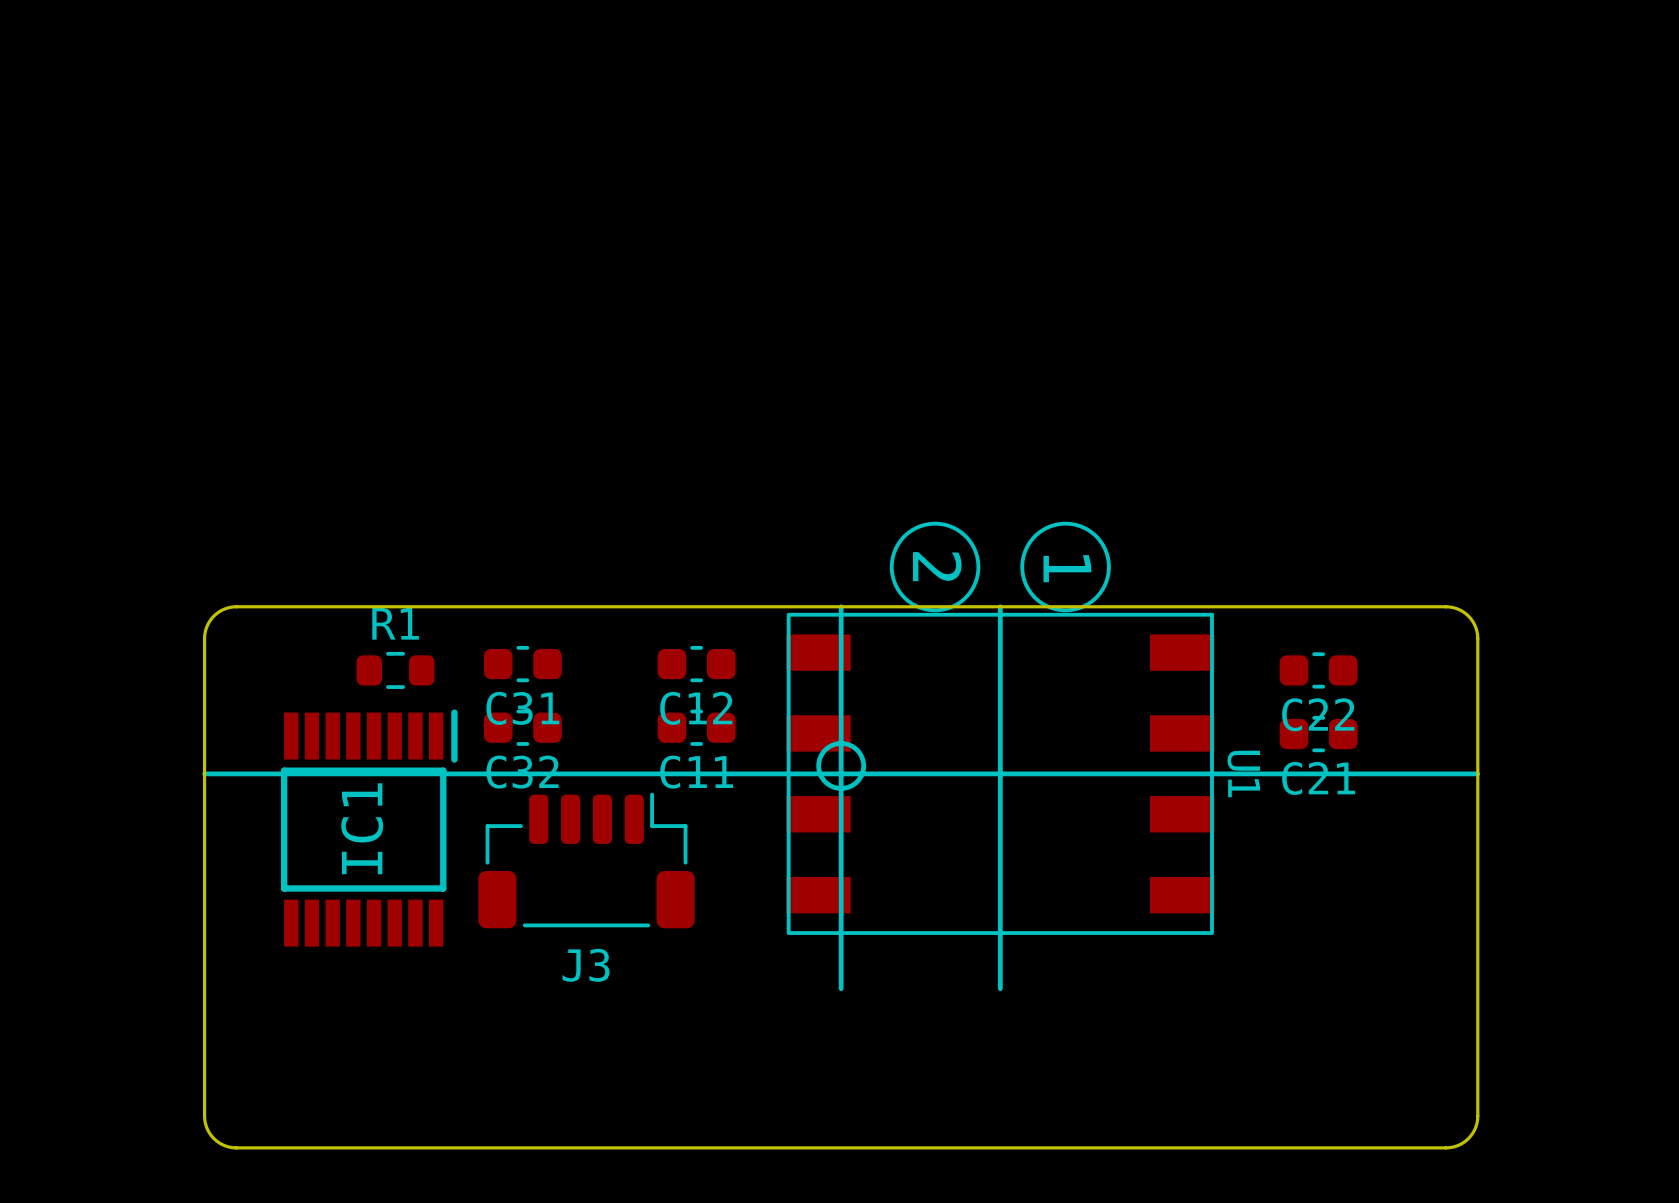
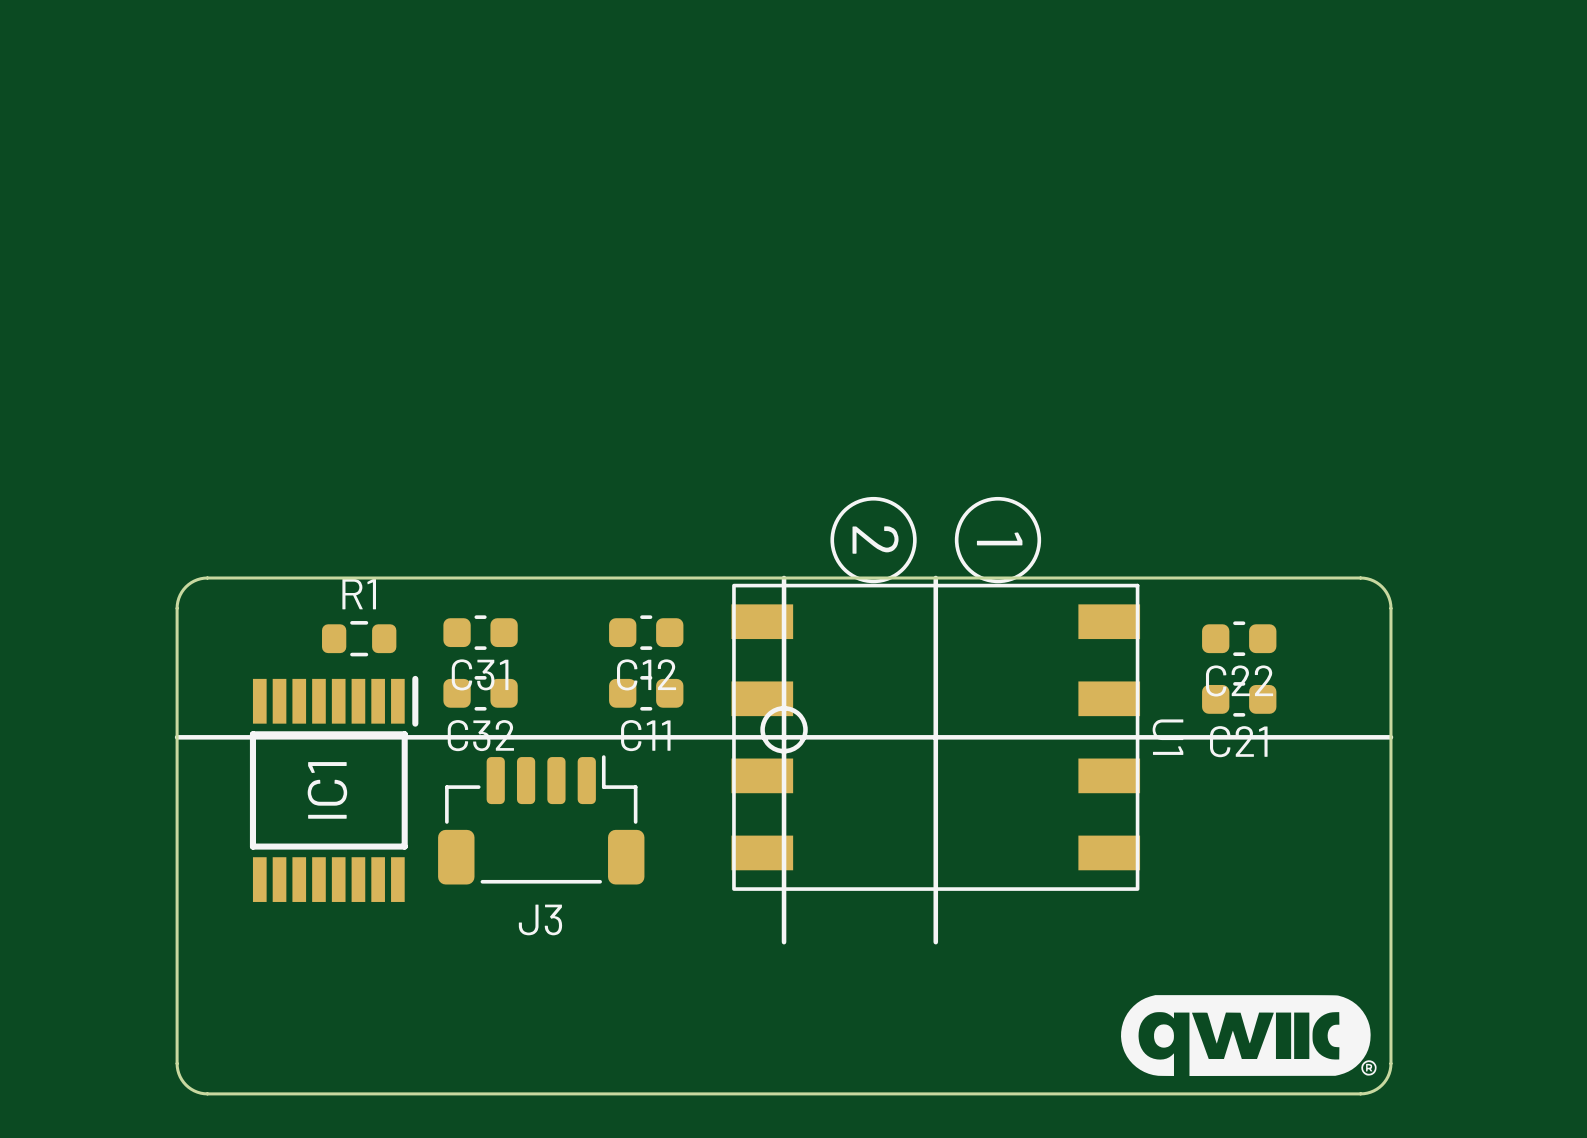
drawing: none -> [1121, 995, 1377, 1077]

